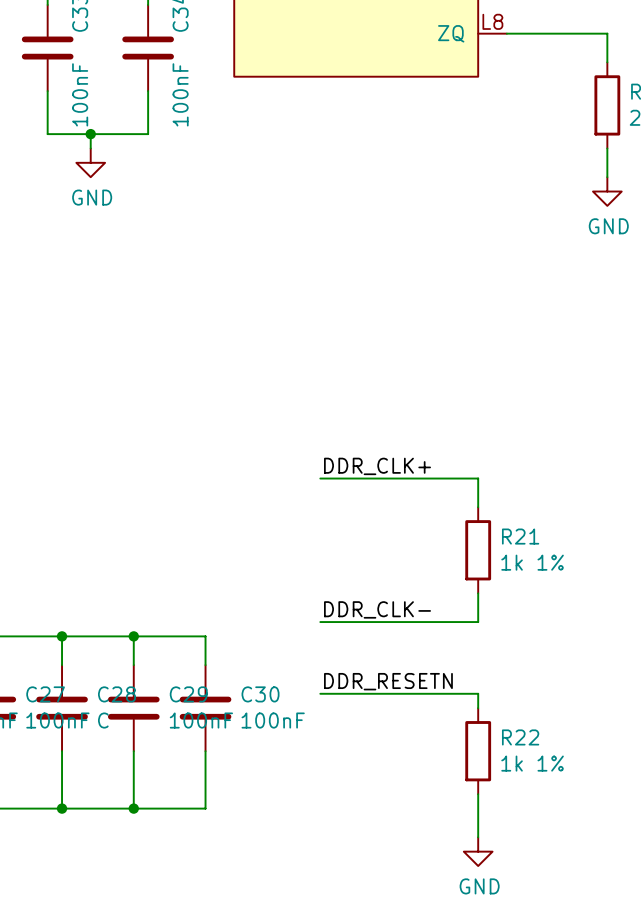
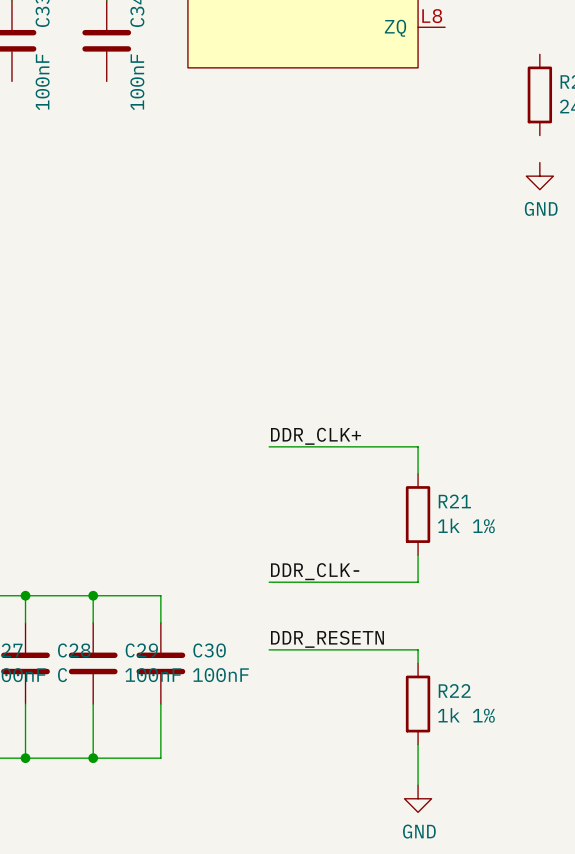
wire: (506, 33) (607, 33) (607, 62) -> none
wire: (47, 91) (47, 134) (148, 134) (148, 91) -> none
wire: (90, 134) (90, 148) -> none
junction: (90, 134) -> none
wire: (607, 148) (607, 177) -> none
power symbol: GND (90, 162) -> none

